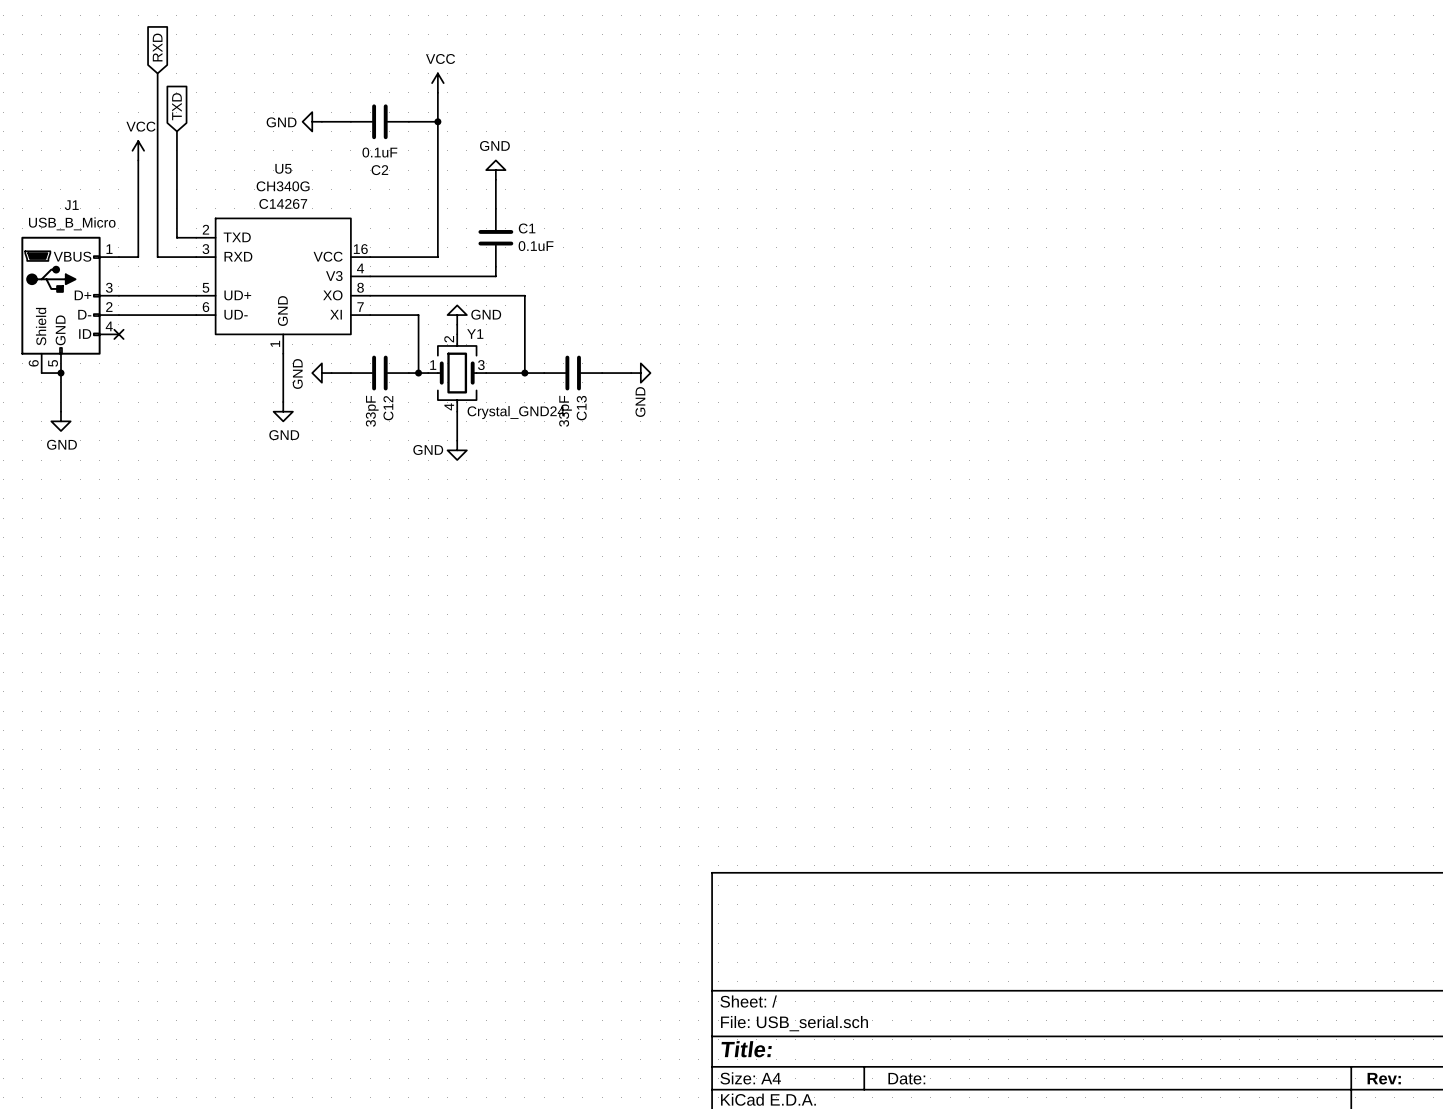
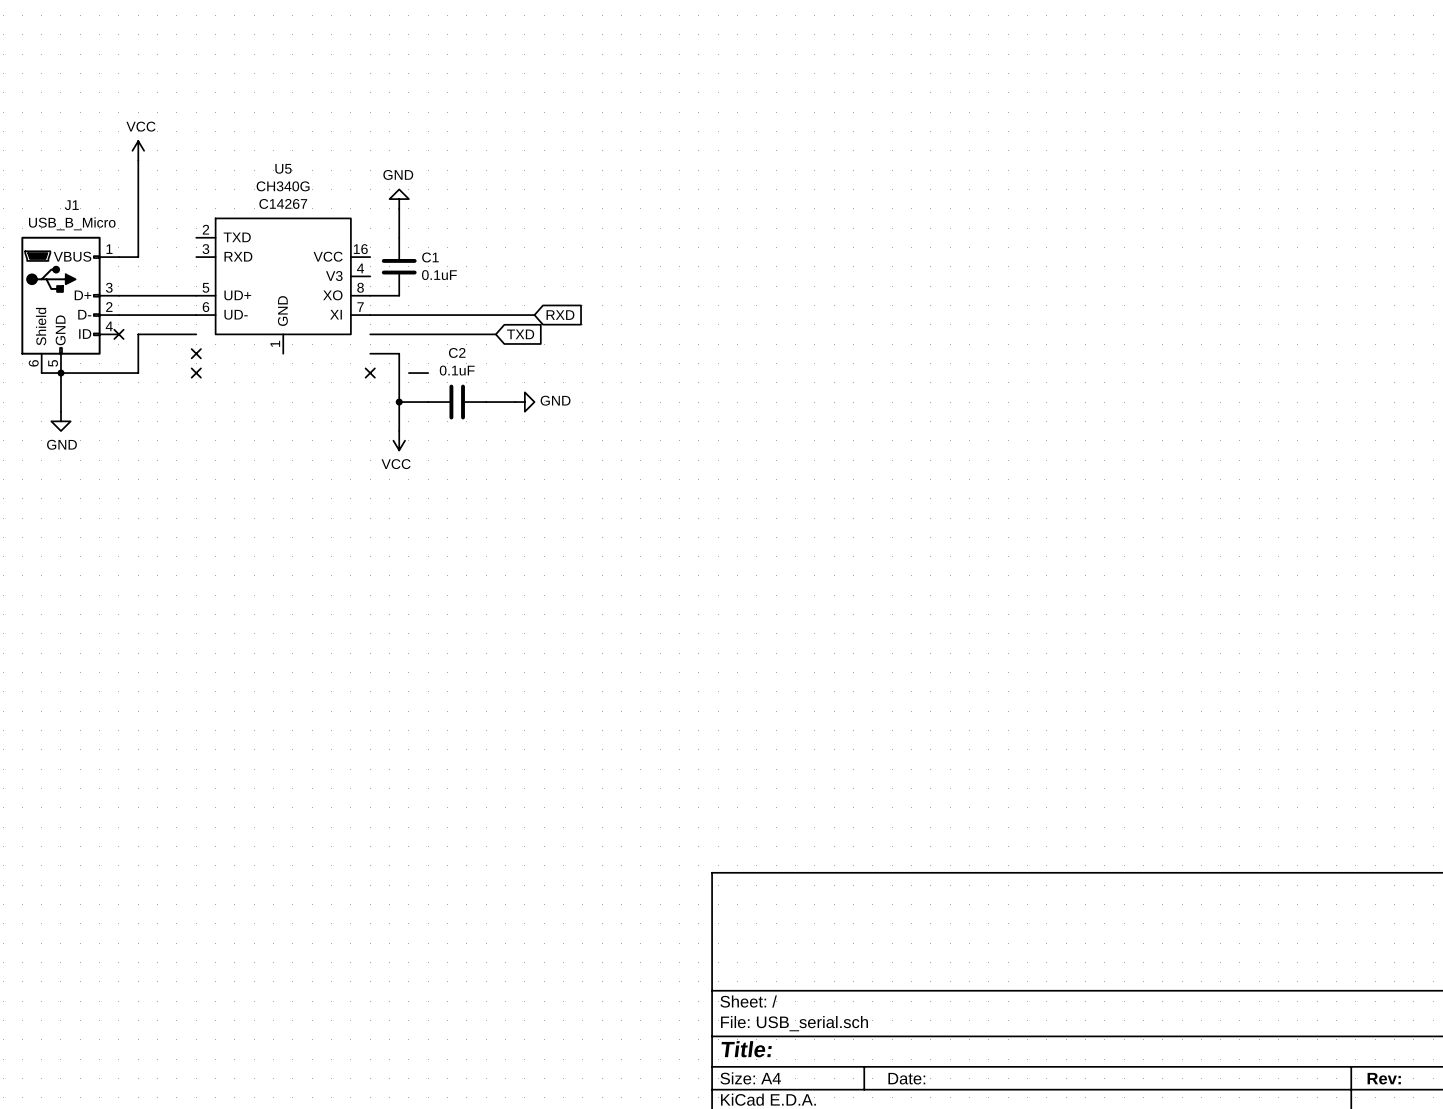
global label: RXD (157, 47) -> none
wire: (157, 73) (157, 257) (196, 257) -> none
power symbol: VCC (437, 83) -> none
wire: (437, 92) (437, 257) (370, 257) -> none
global label: TXD (176, 106) -> none
power symbol: GND (312, 121) -> none
wire: (321, 121) (350, 121) -> none
C2 position: (379, 121) -> (457, 402)
wire: (408, 121) (437, 121) -> none
junction: (437, 121) -> none
wire: (176, 131) (176, 237) (196, 237) -> none
C2 value position: 0.1uF (379, 152) -> 0.1uF (457, 370)
C2 name position: C2 (379, 170) -> C2 (457, 352)
power symbol: GND (495, 170) -> none
wire: (495, 179) (495, 208) -> (399, 208) (399, 237)
power symbol: none -> GND (399, 199)
C1 position: (495, 237) -> (399, 266)
wire: (495, 266) (495, 276) (370, 276) -> none
wire: (399, 295) (524, 295) (524, 373) -> none
wire: (418, 315) (418, 373) -> (418, 315) (534, 315)
power symbol: GND (457, 315) -> none
global label: none -> RXD (560, 315)
wire: (457, 324) (457, 334) -> none
wire: none -> (196, 334) (138, 334) (138, 373) (60, 373)
wire: none -> (370, 334) (495, 334)
global label: none -> TXD (520, 334)
no-connect mark: none -> (196, 353)
wire: (283, 353) (283, 402) -> none
wire: none -> (370, 353) (399, 353) (399, 431)
no-connect mark: none -> (196, 373)
power symbol: GND (321, 373) -> none
wire: (331, 373) (350, 373) -> none
no-connect mark: none -> (370, 373)
C12: 33pF (379, 373) -> none
junction position: (418, 373) -> (399, 402)
Y1: Crystal_GND24 (457, 373) -> none
wire: (486, 373) (544, 373) -> none
junction: (524, 373) -> none
C13: 33pF (573, 373) -> none
wire: (602, 373) (631, 373) -> (486, 402) (515, 402)
power symbol: GND (640, 373) -> none
wire: none -> (399, 402) (428, 402)
power symbol: none -> GND (524, 402)
power symbol: GND (283, 411) -> none
wire: (457, 411) (457, 440) -> none
power symbol: none -> VCC (399, 440)
power symbol: GND (457, 450) -> none

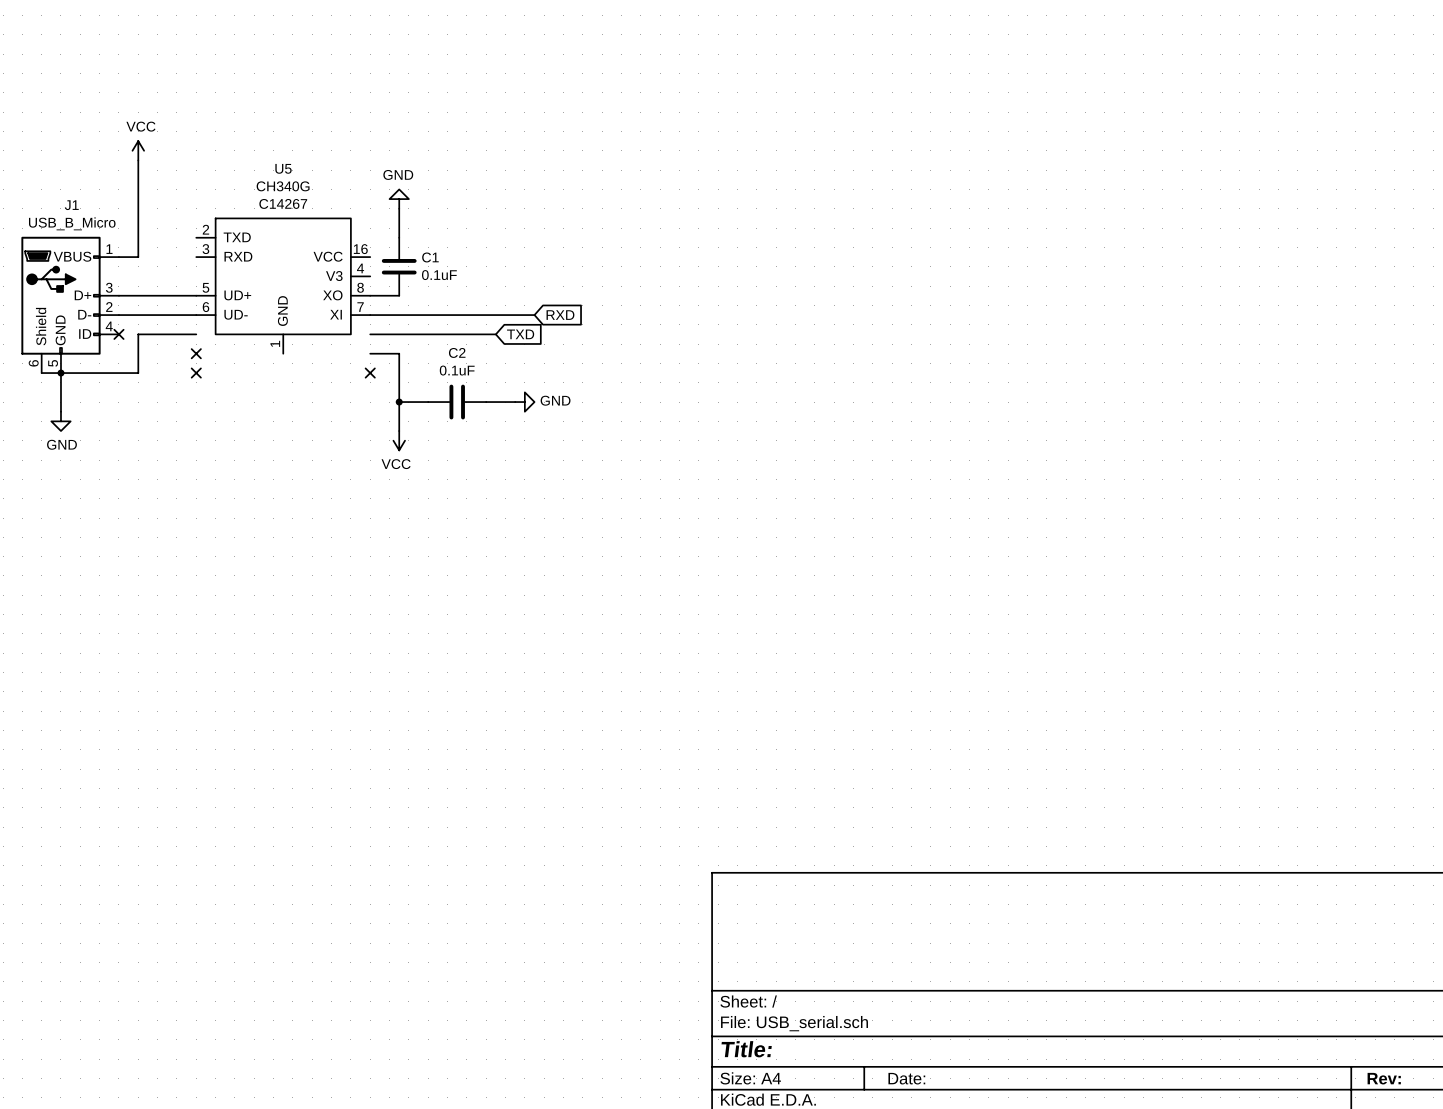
wire: (408, 373) (428, 373) -> none

